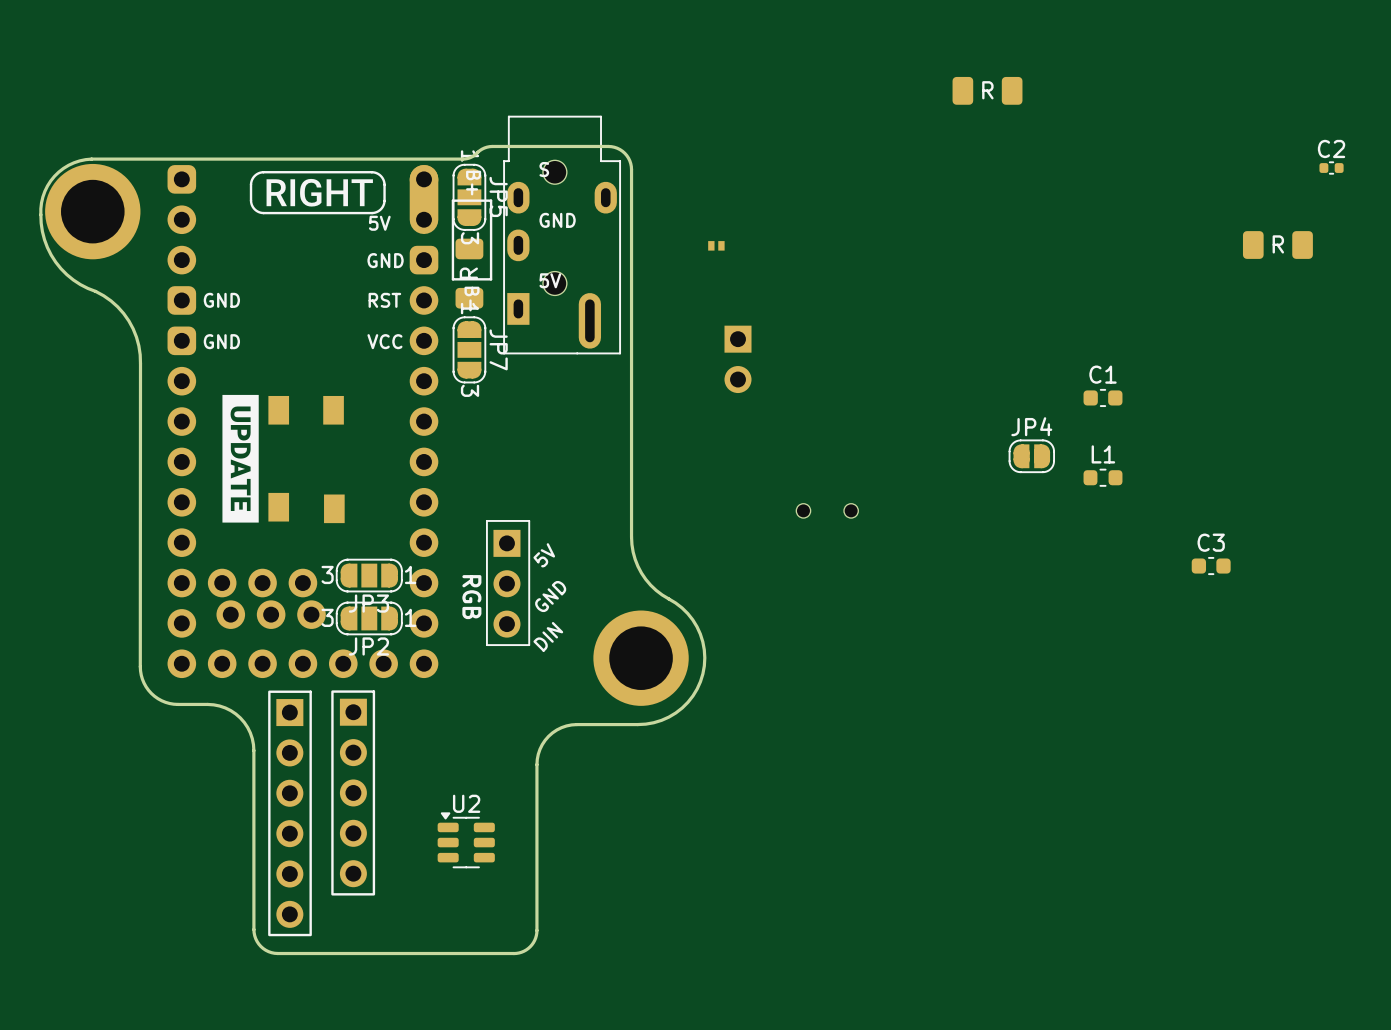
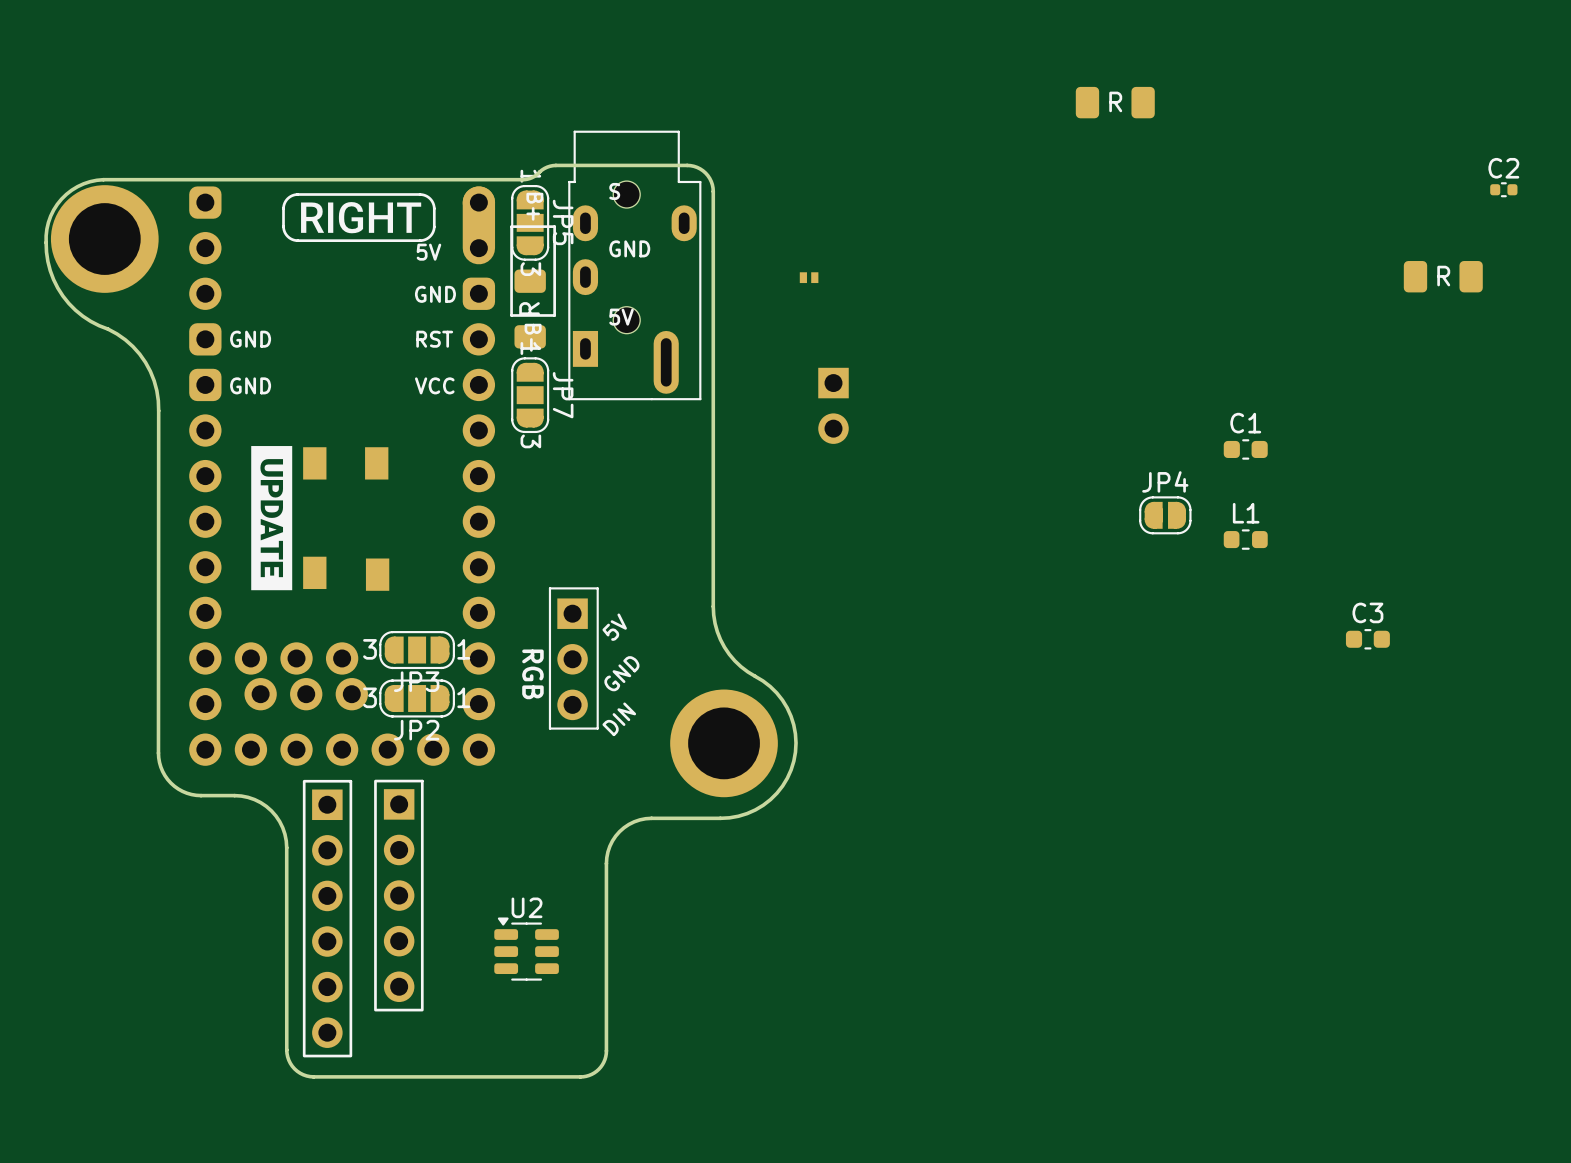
part: (827, 510) -> none

